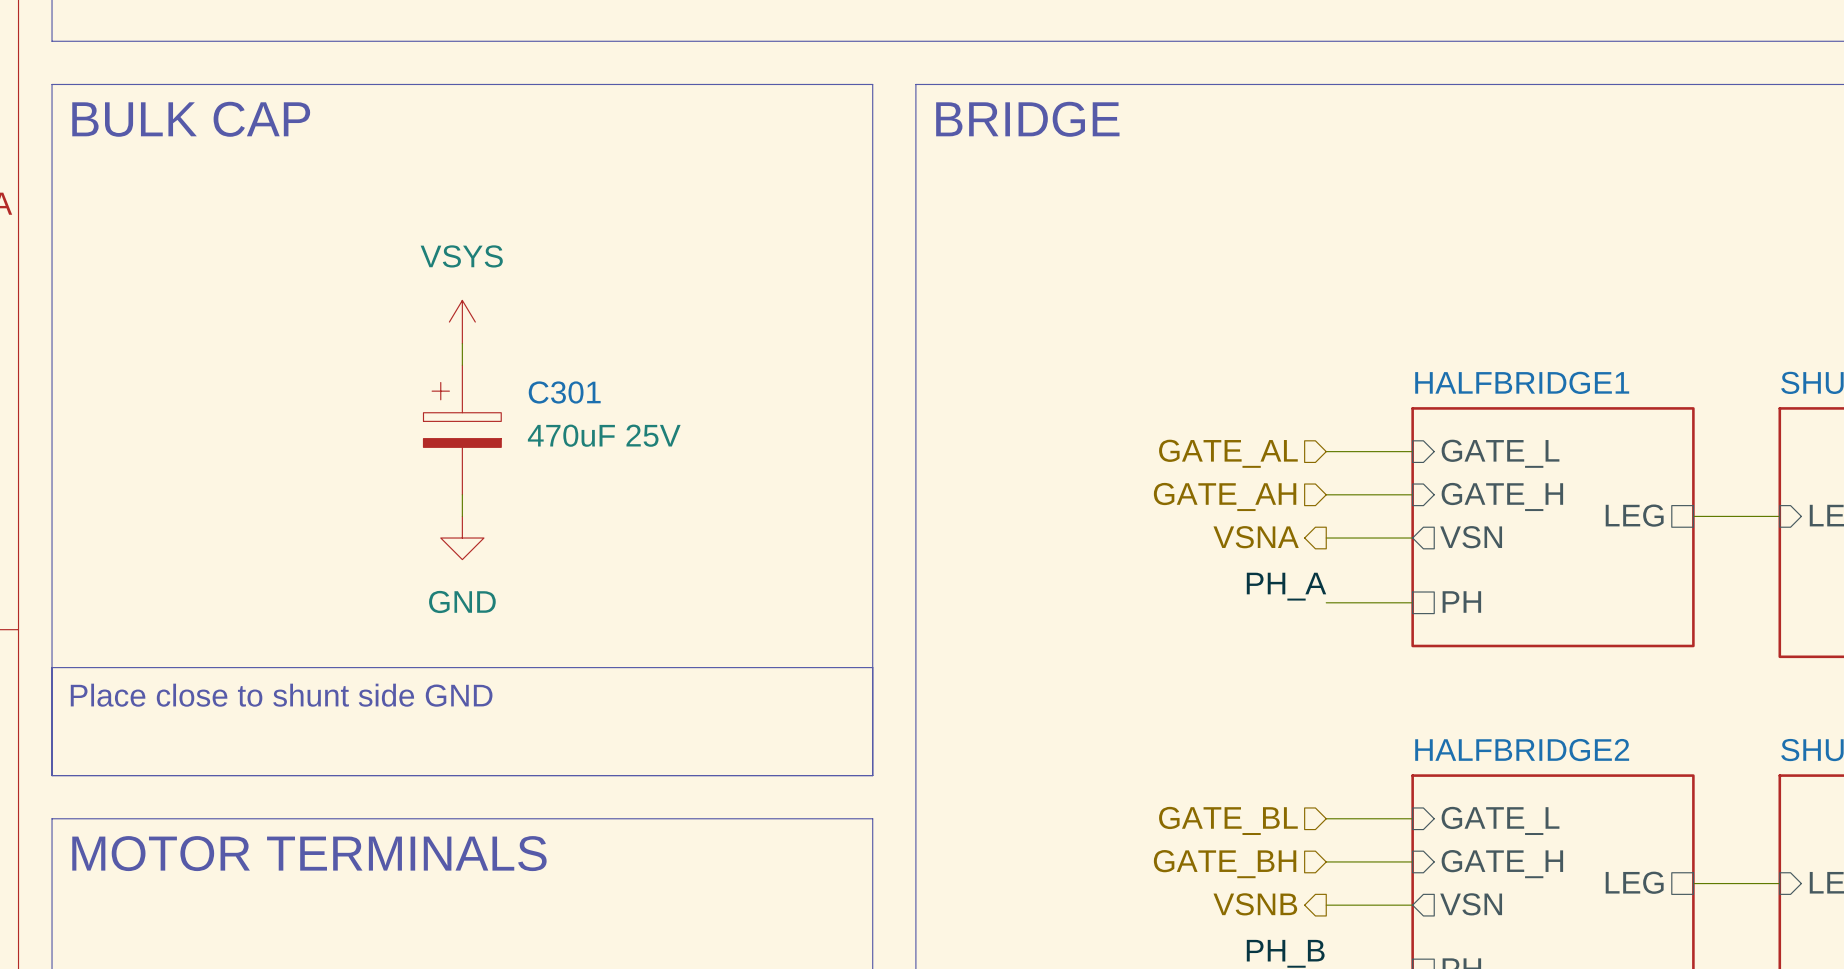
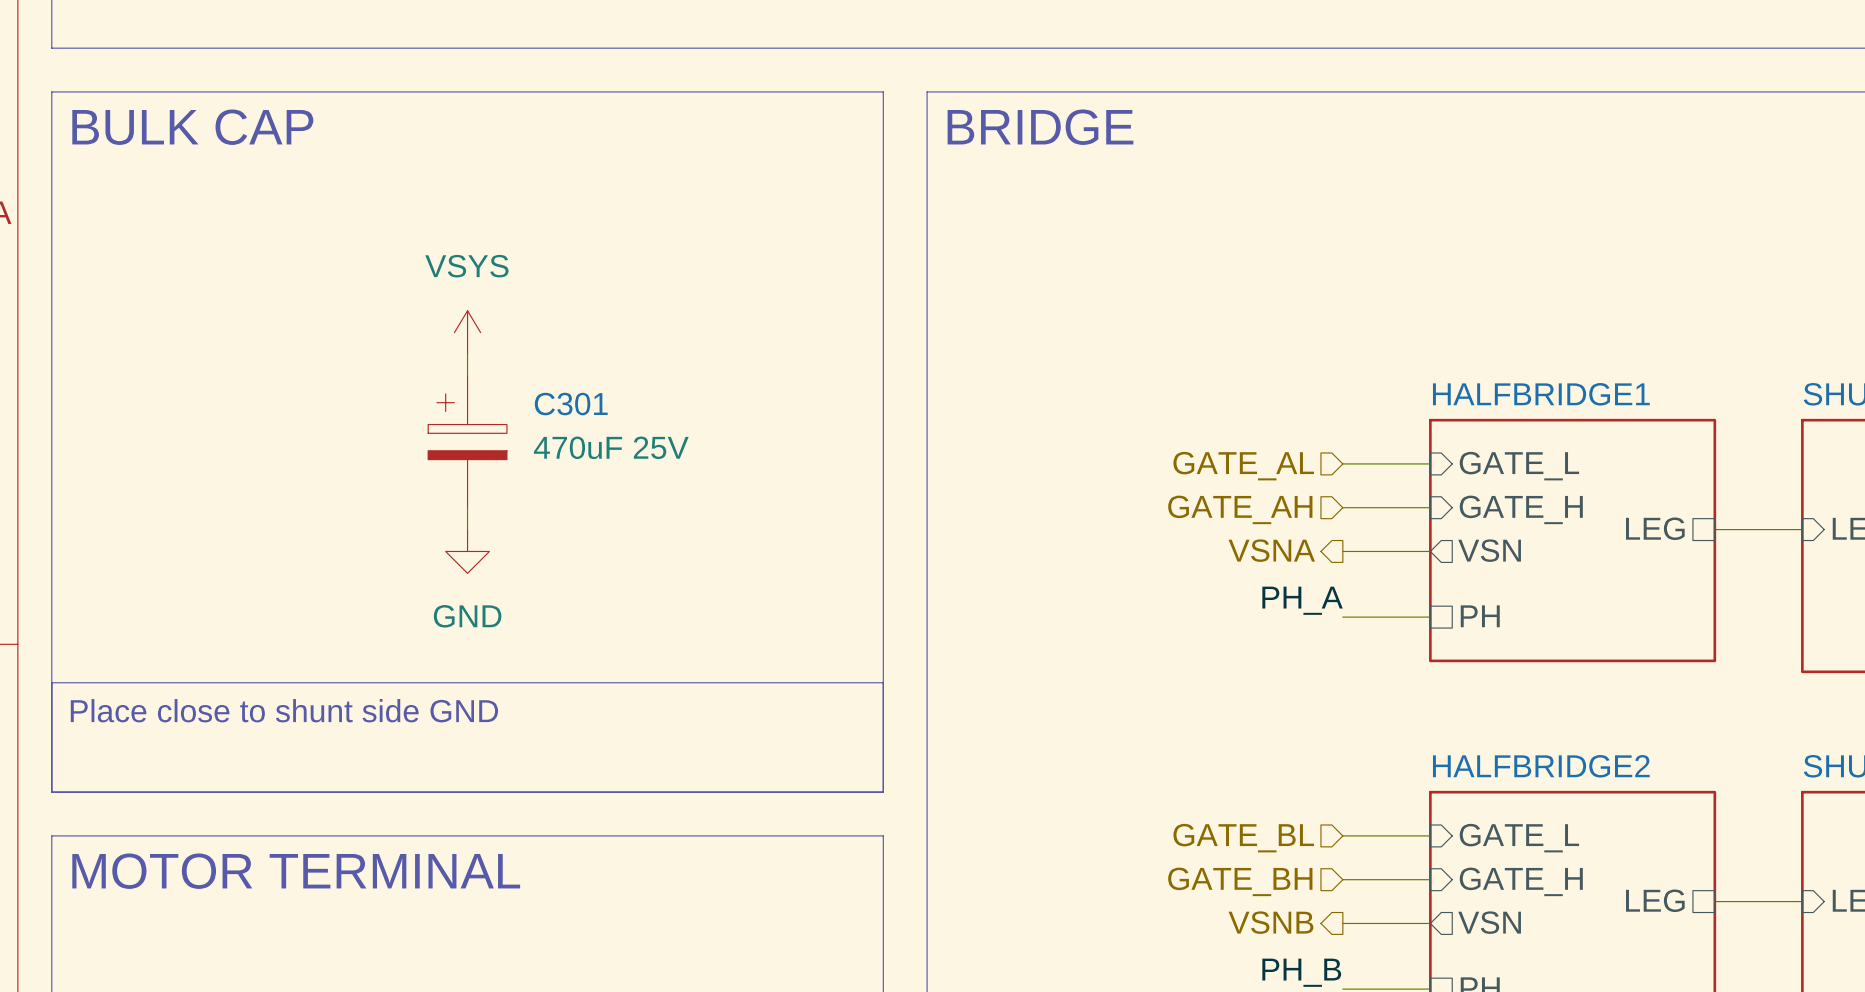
text: MOTOR TERMINALS (309, 853) -> MOTOR TERMINAL (296, 871)

